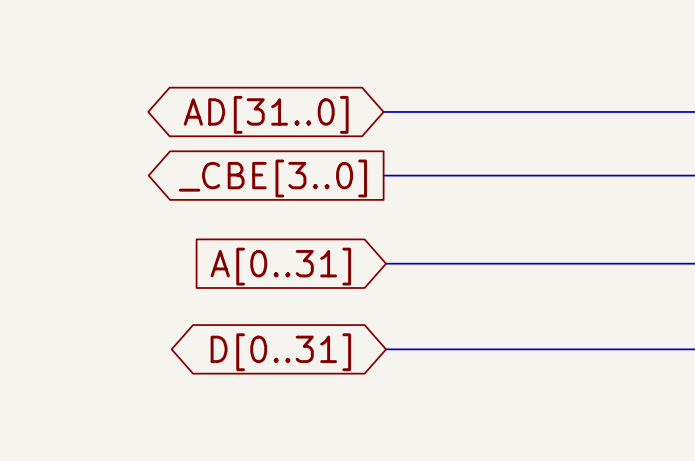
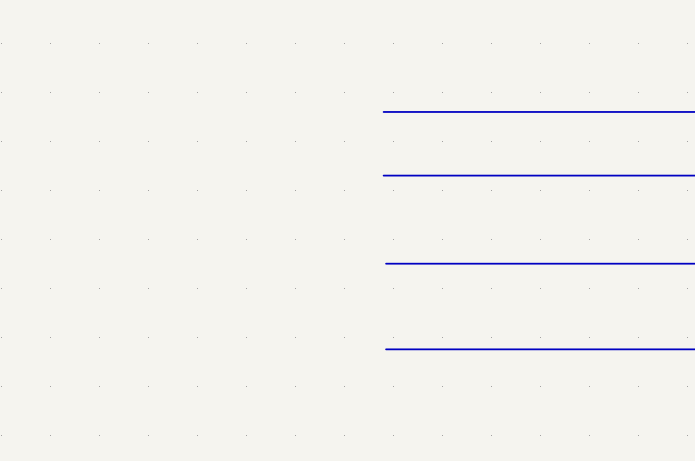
global label: AD[31..0] (266, 114) -> none
global label: _CBE[3..0] (272, 178) -> none
global label: A[0..31] (280, 266) -> none
global label: D[0..31] (280, 352) -> none

